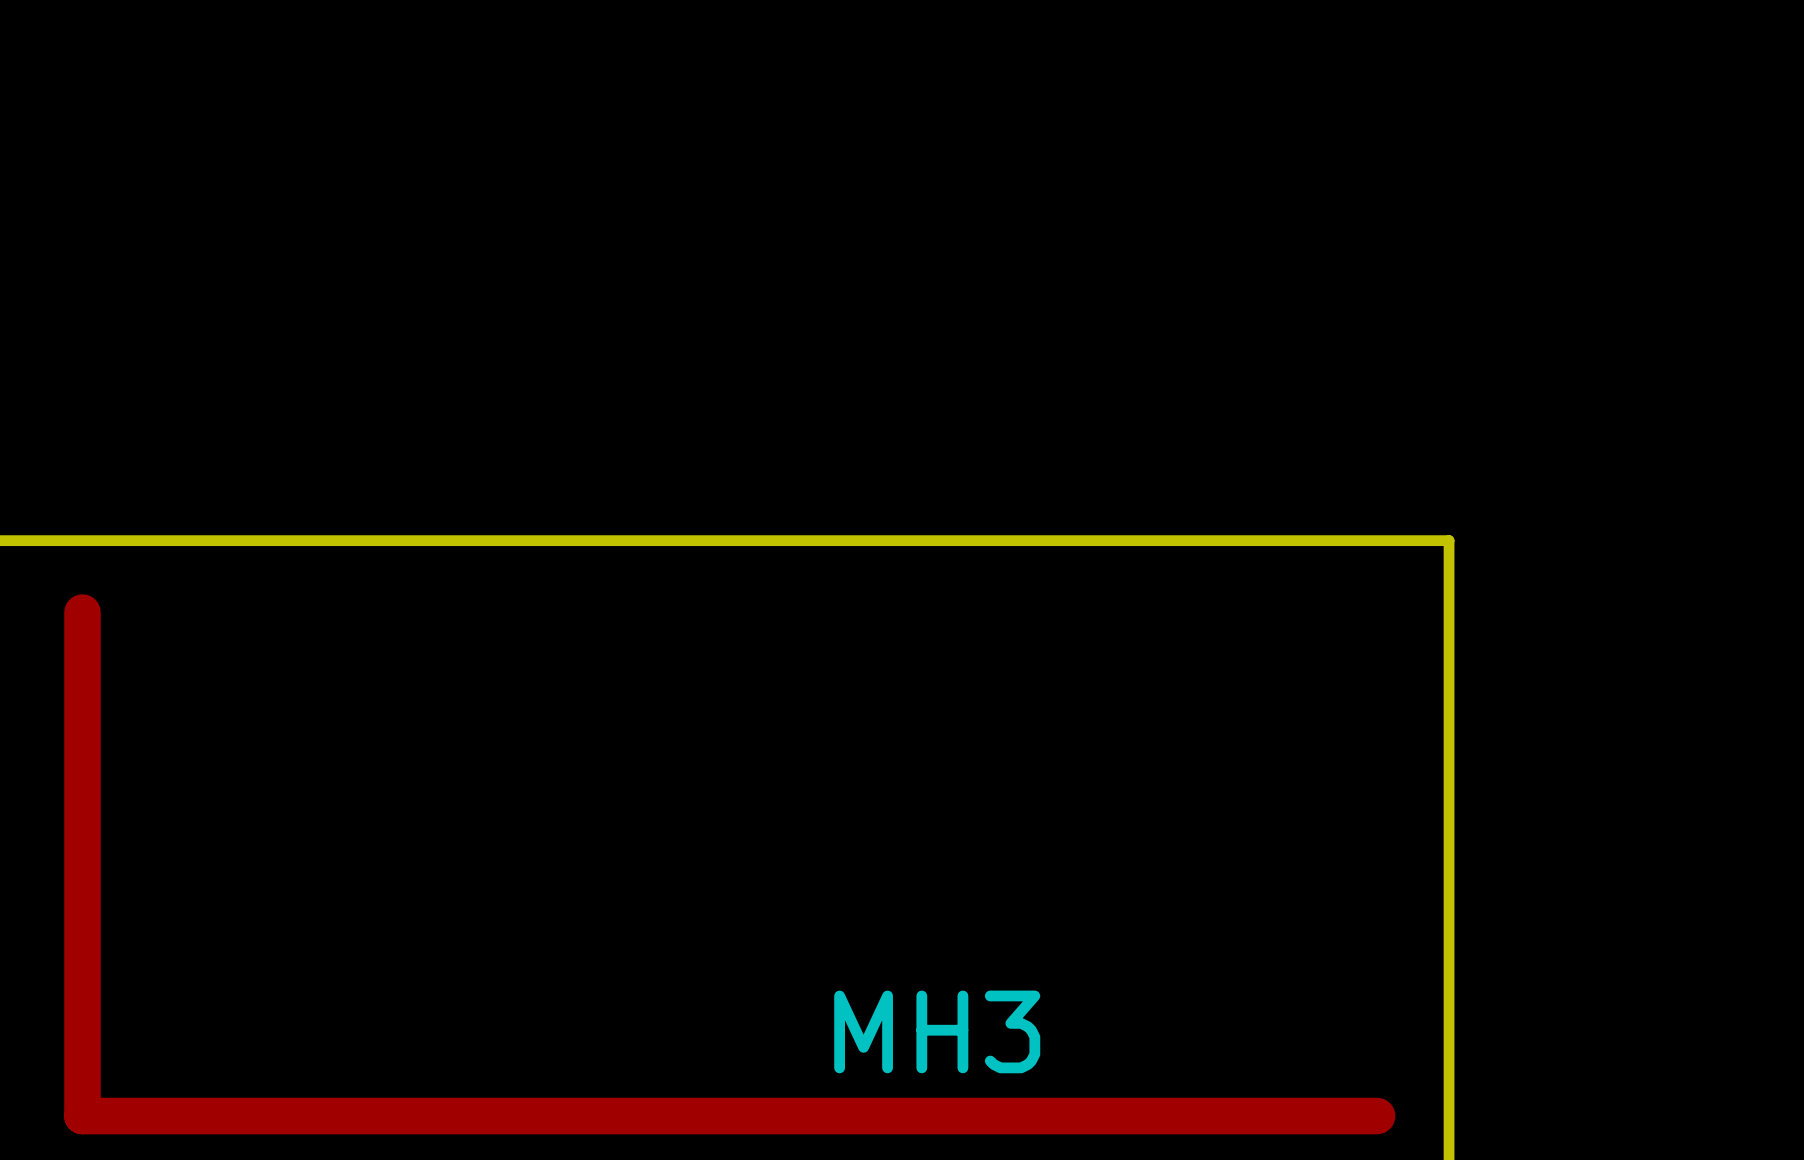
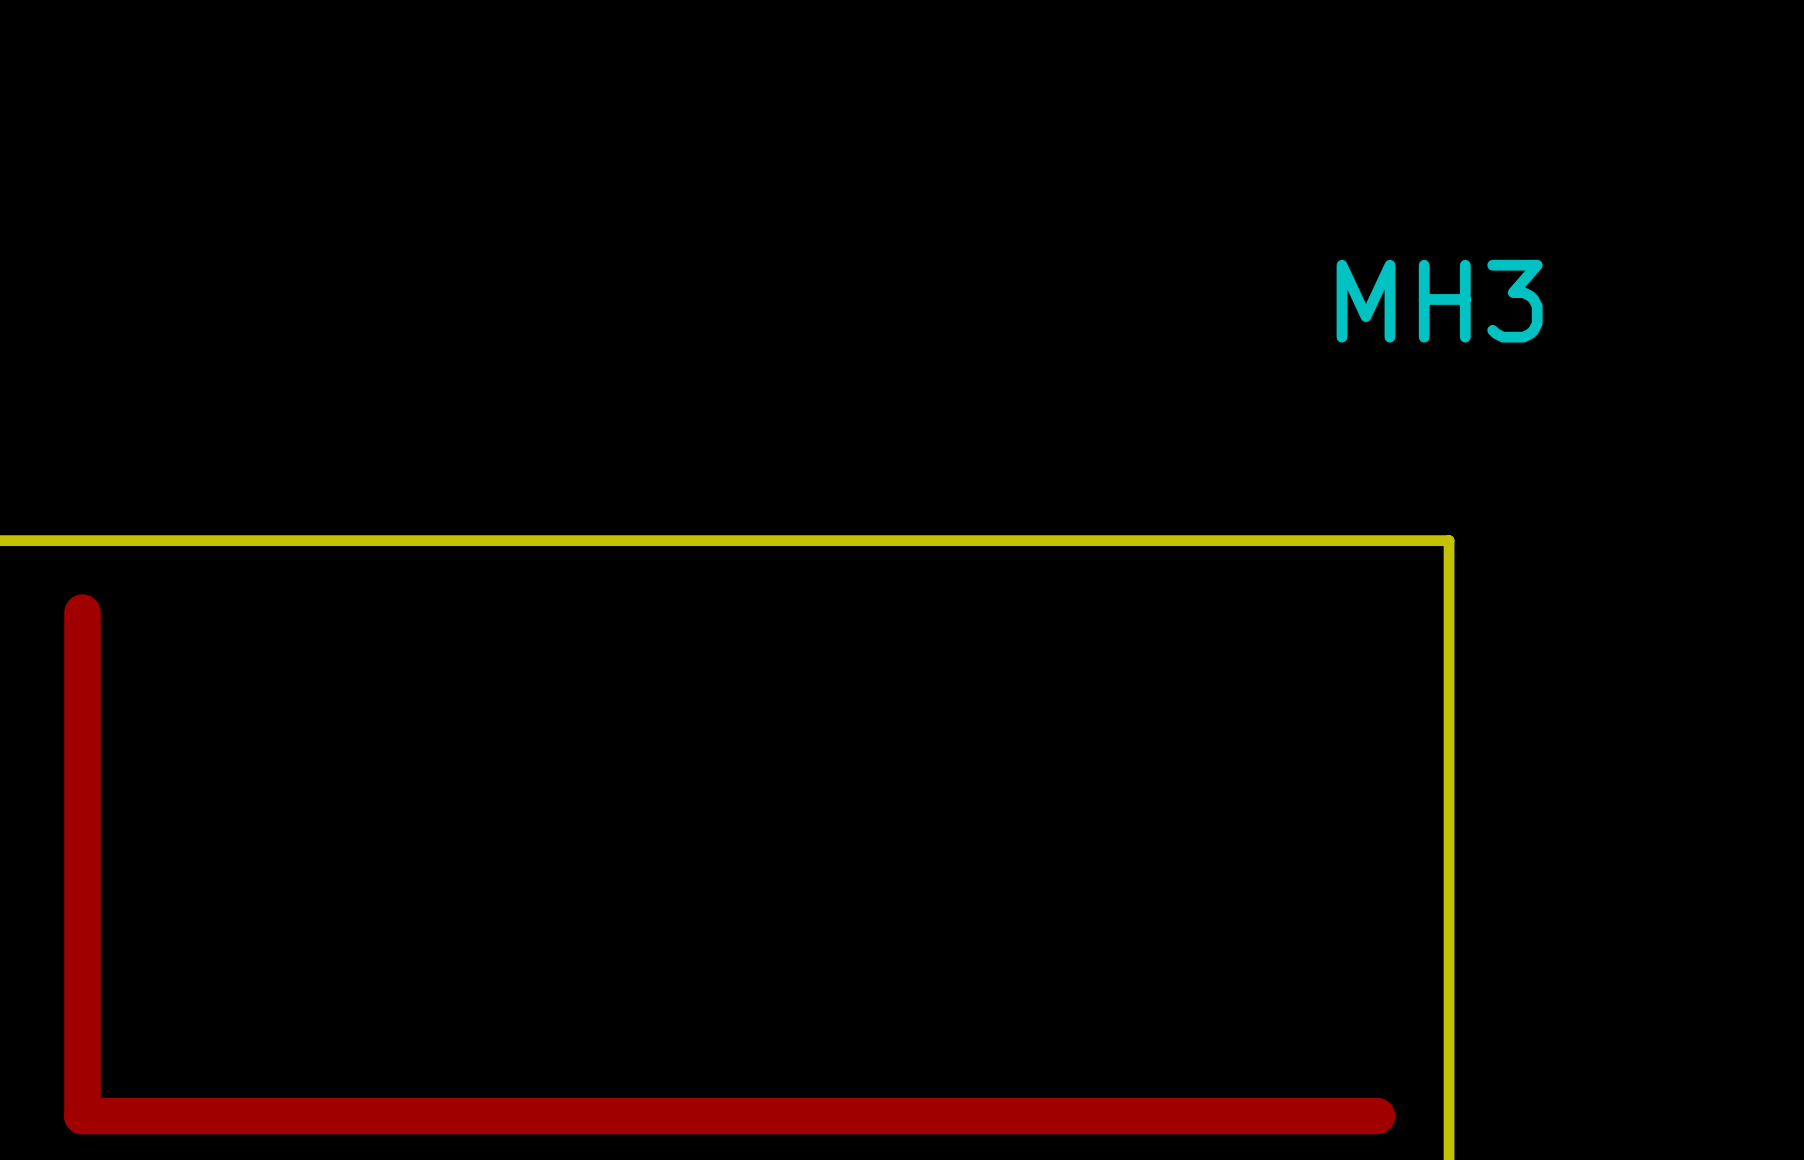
MH3 name position: MH3 (937, 1031) -> MH3 (1439, 301)

